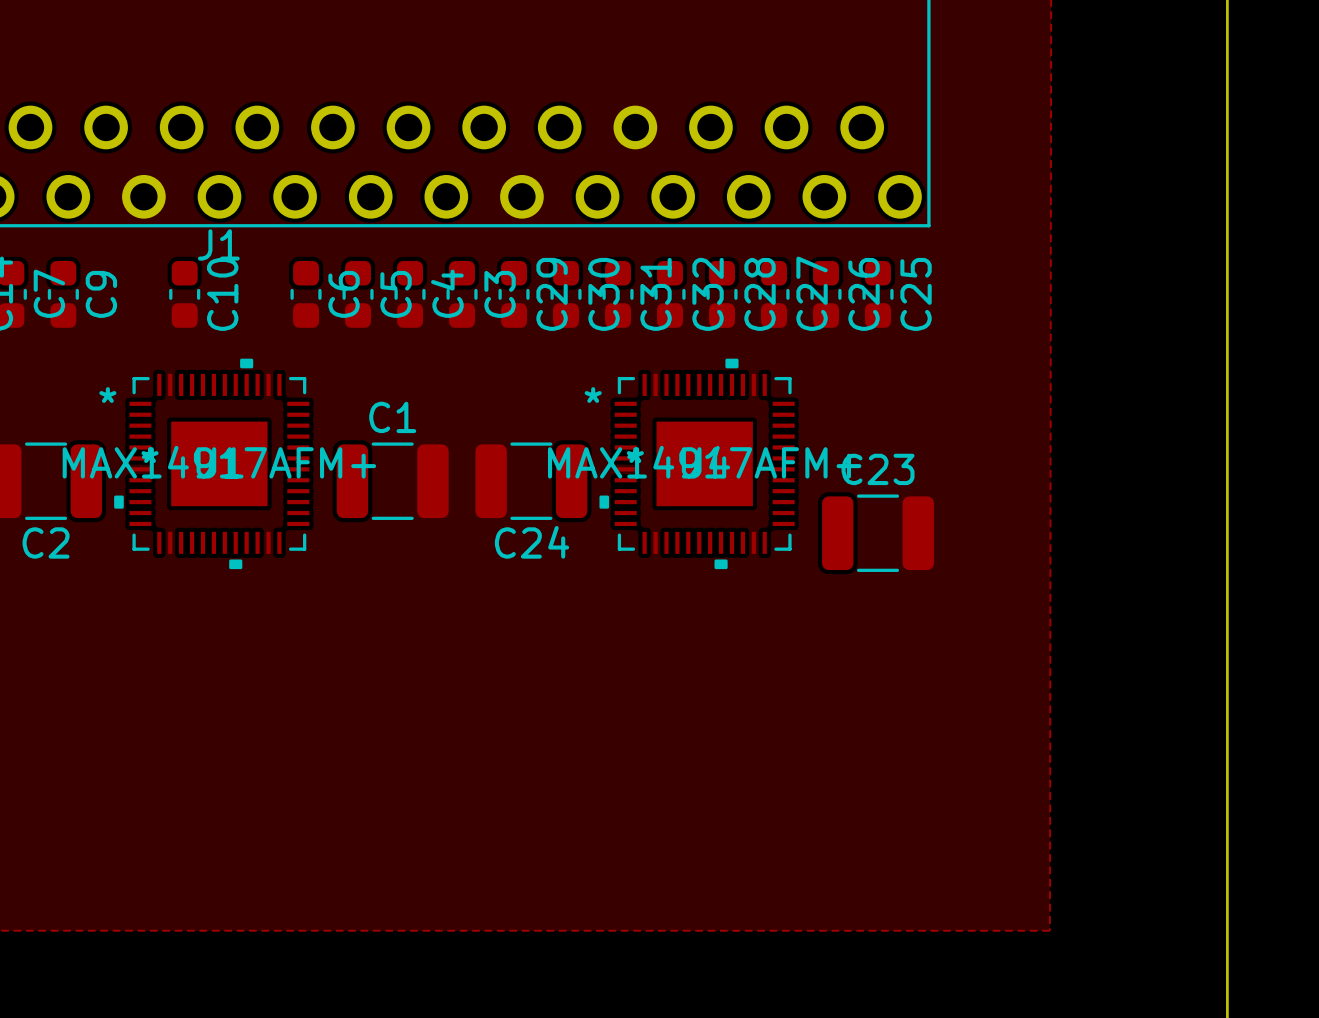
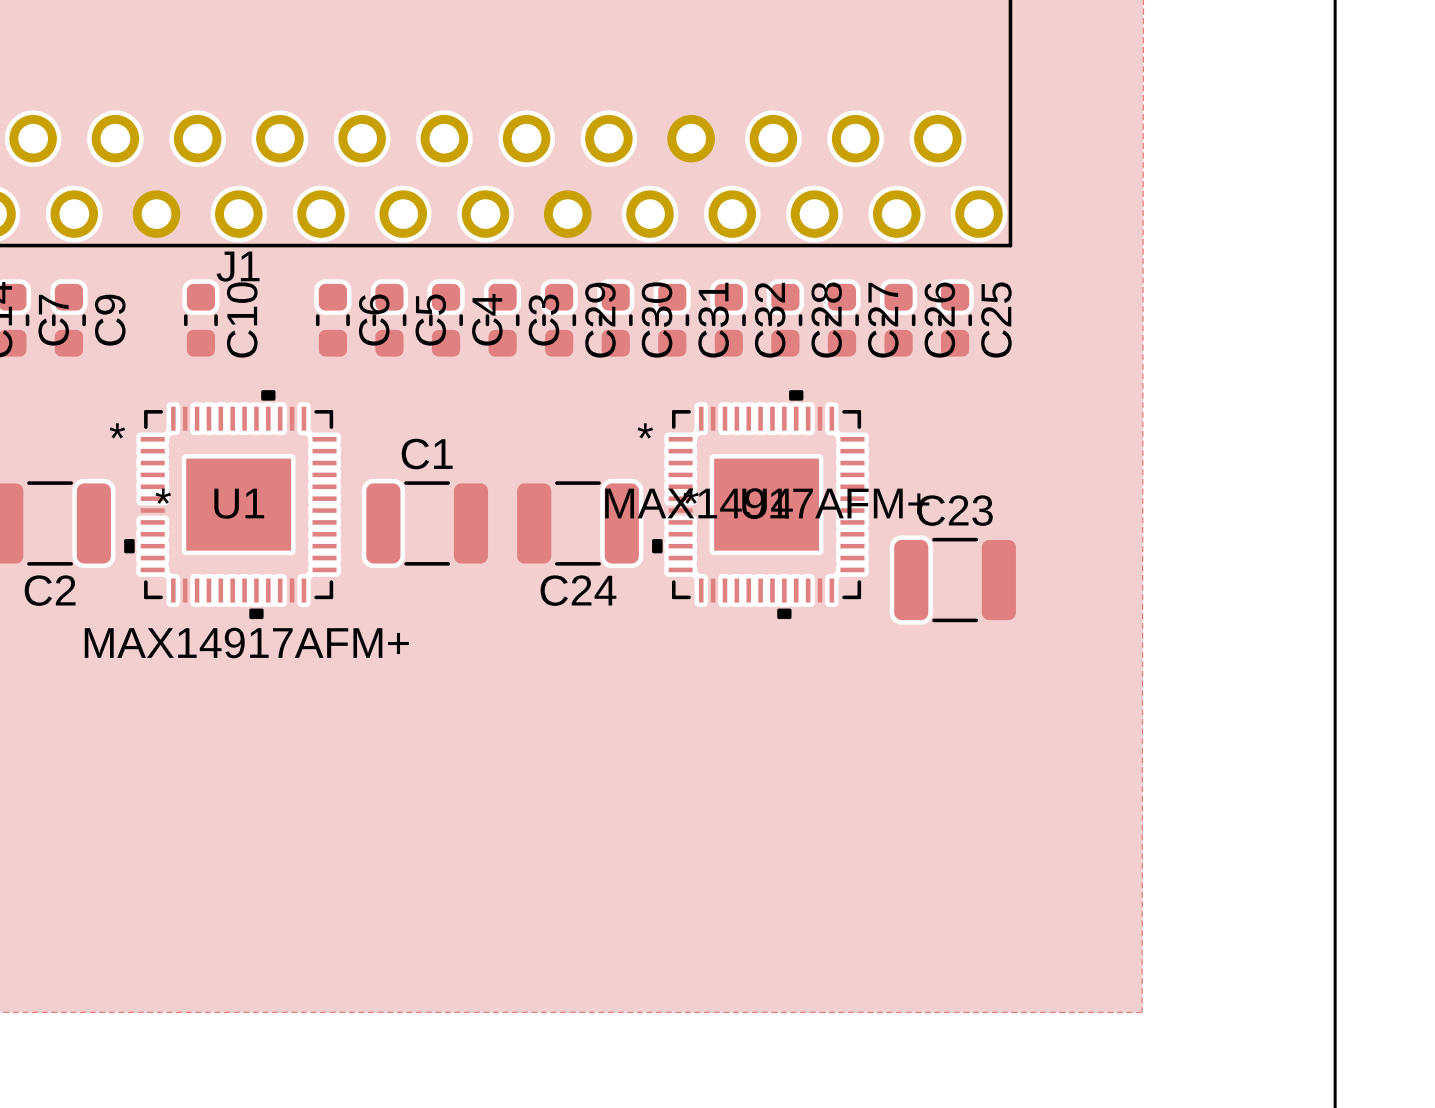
U1 value position: MAX14917AFM+ (219, 462) -> MAX14917AFM+ (246, 643)

